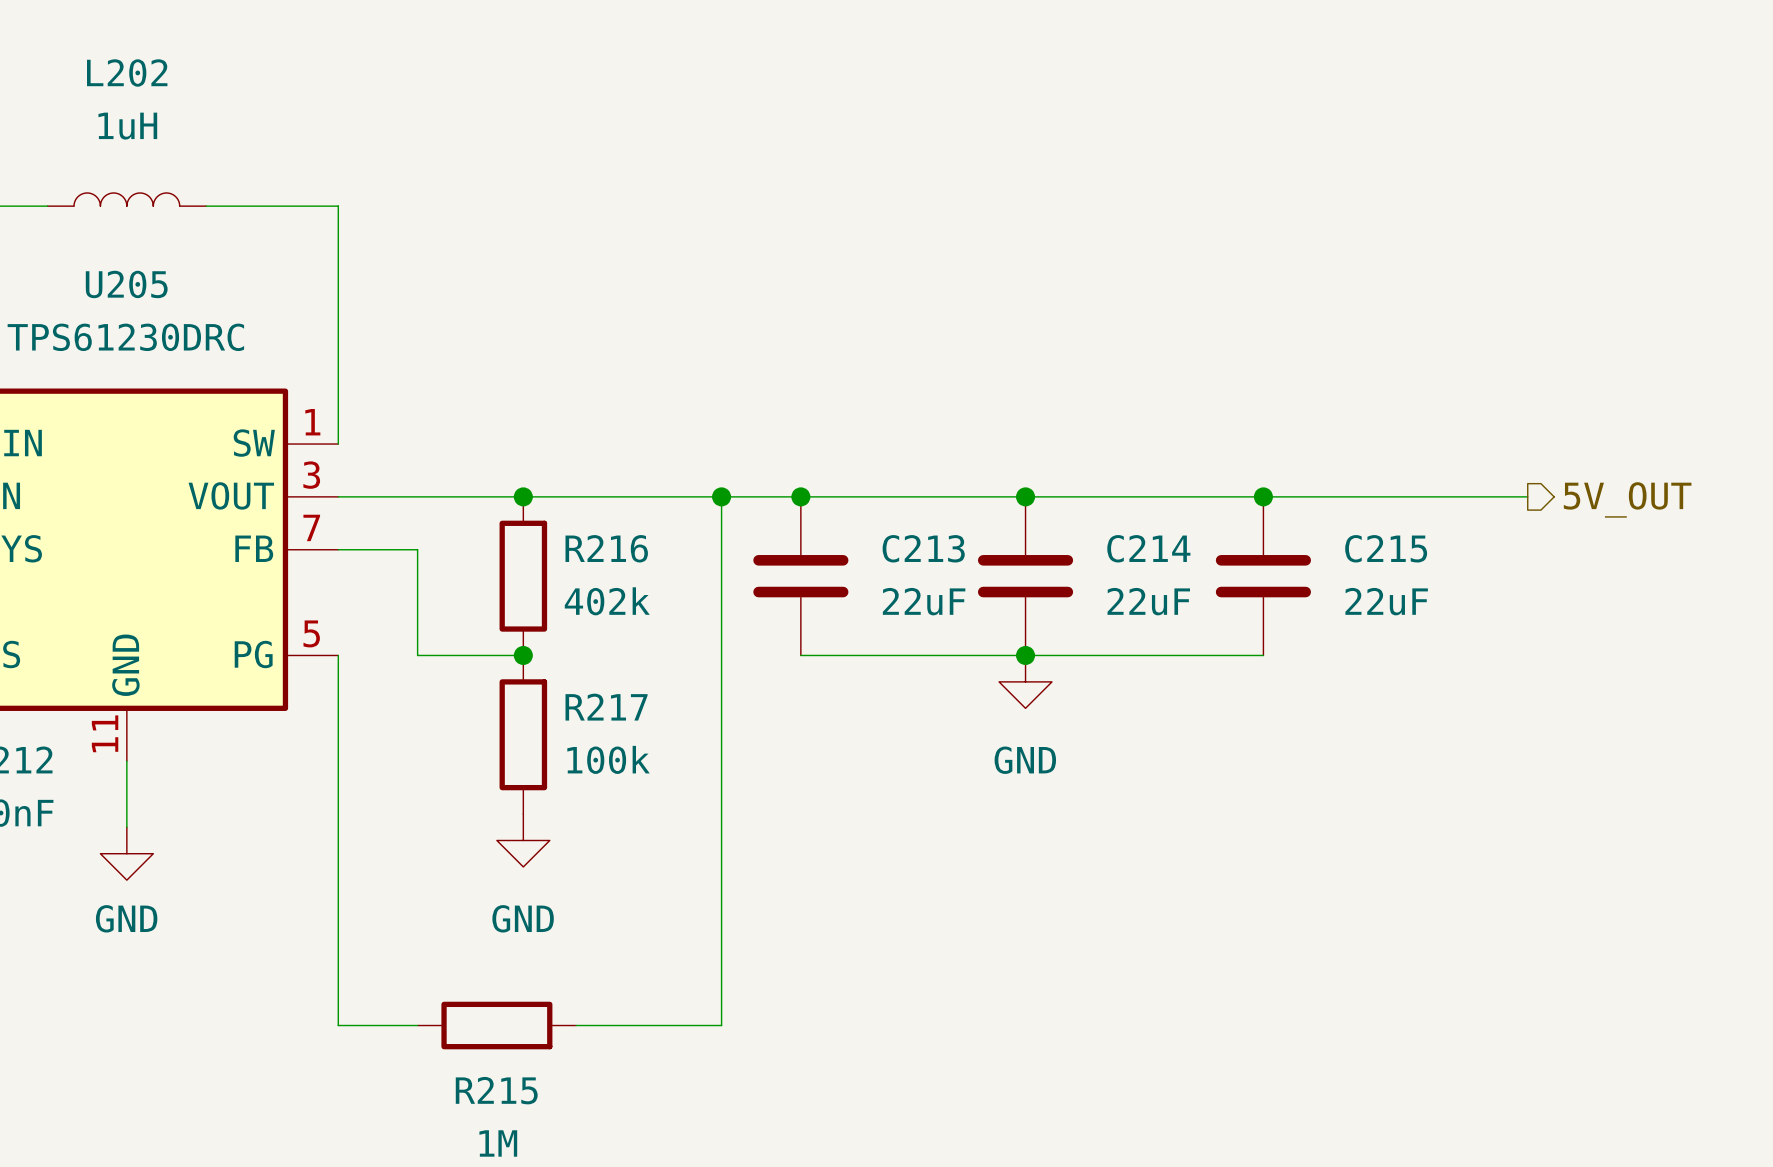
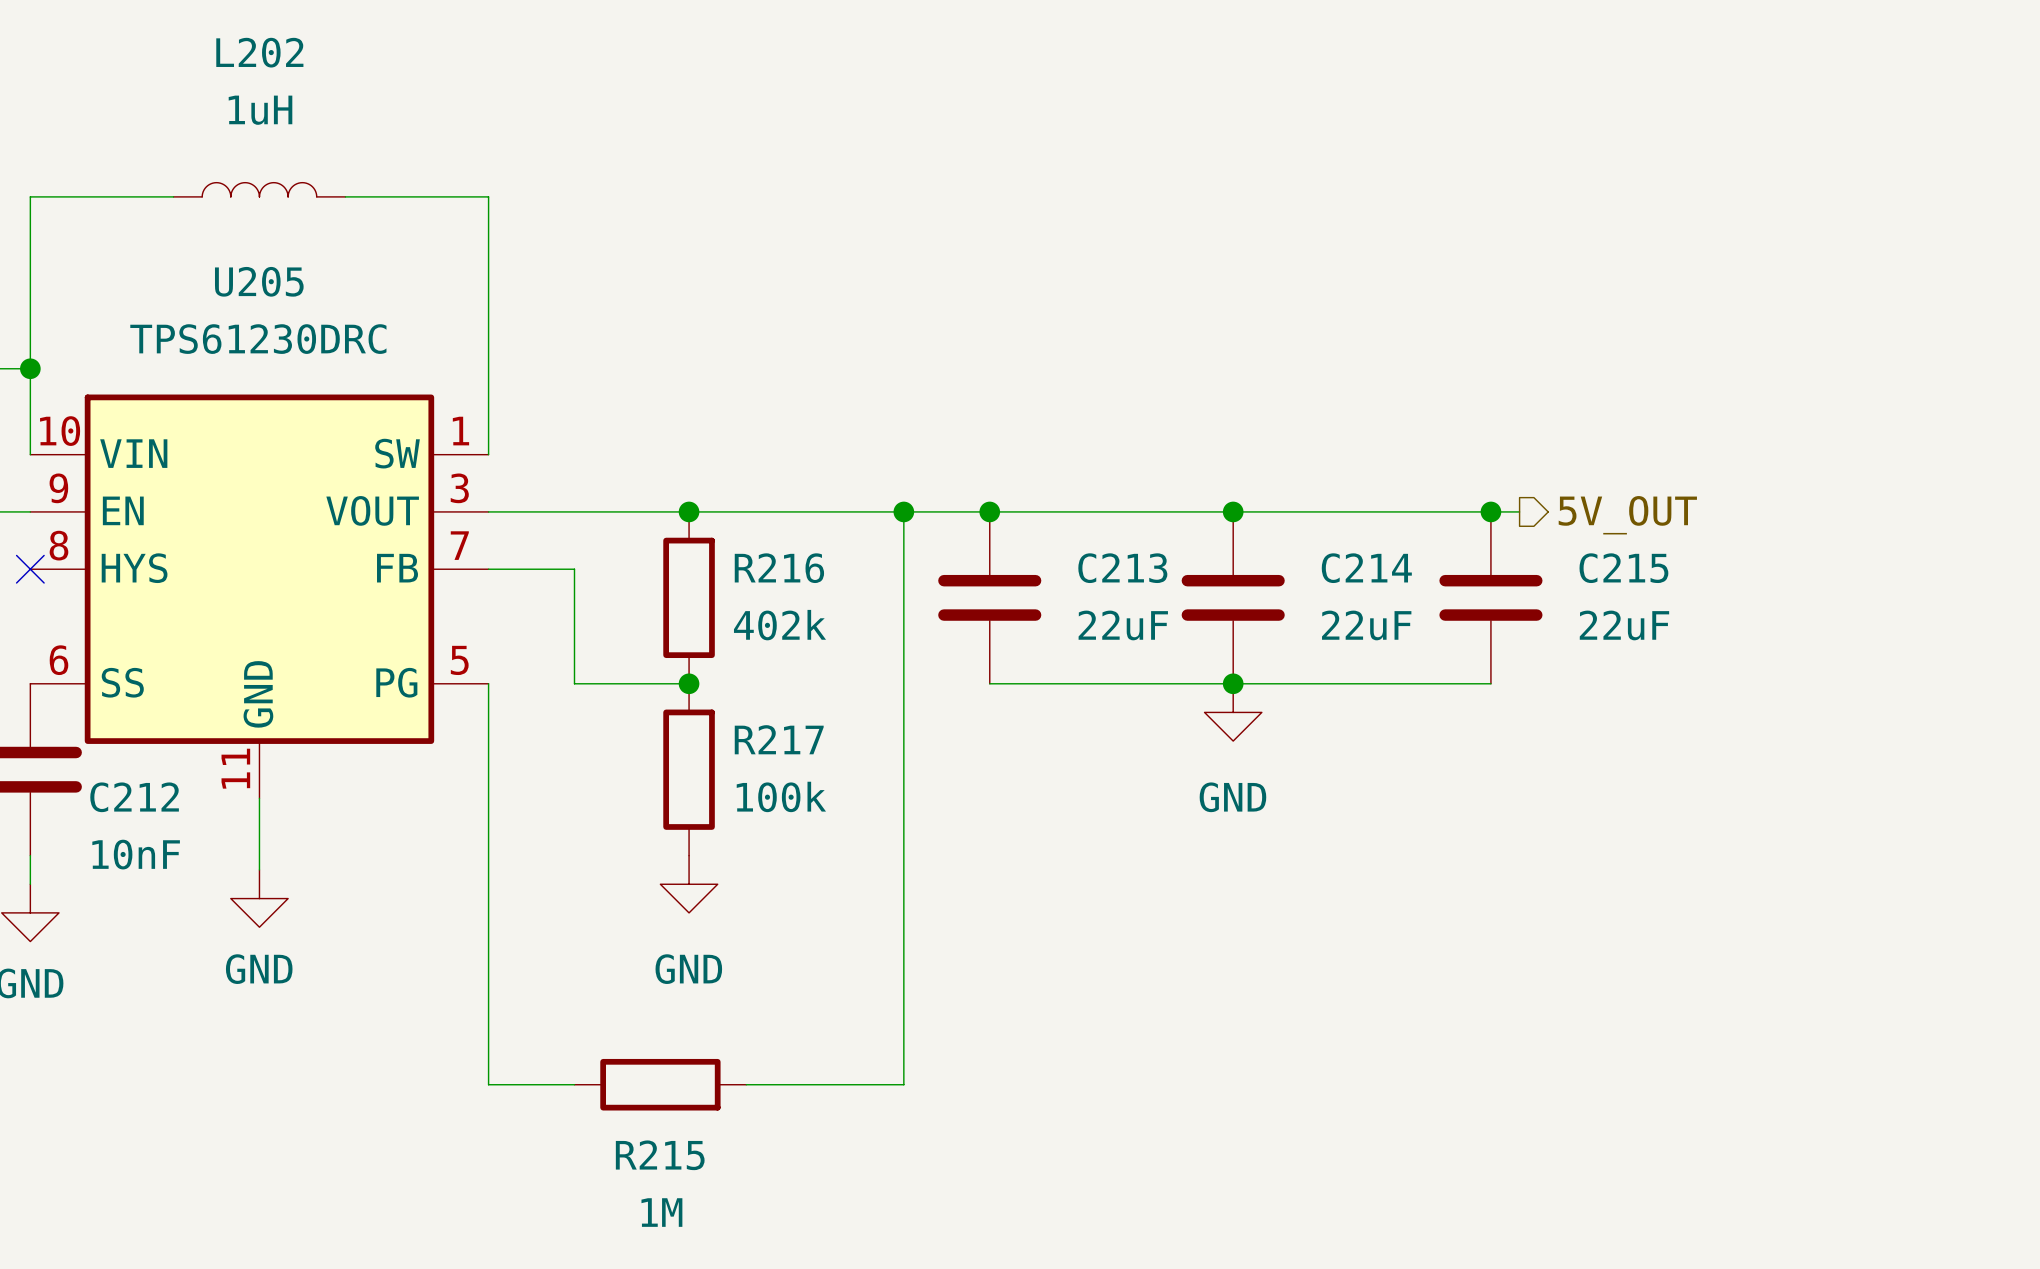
wire: (1289, 496) (1527, 496) -> none
hierarchical label position: 5V_OUT (1627, 499) -> 5V_OUT (1627, 515)

